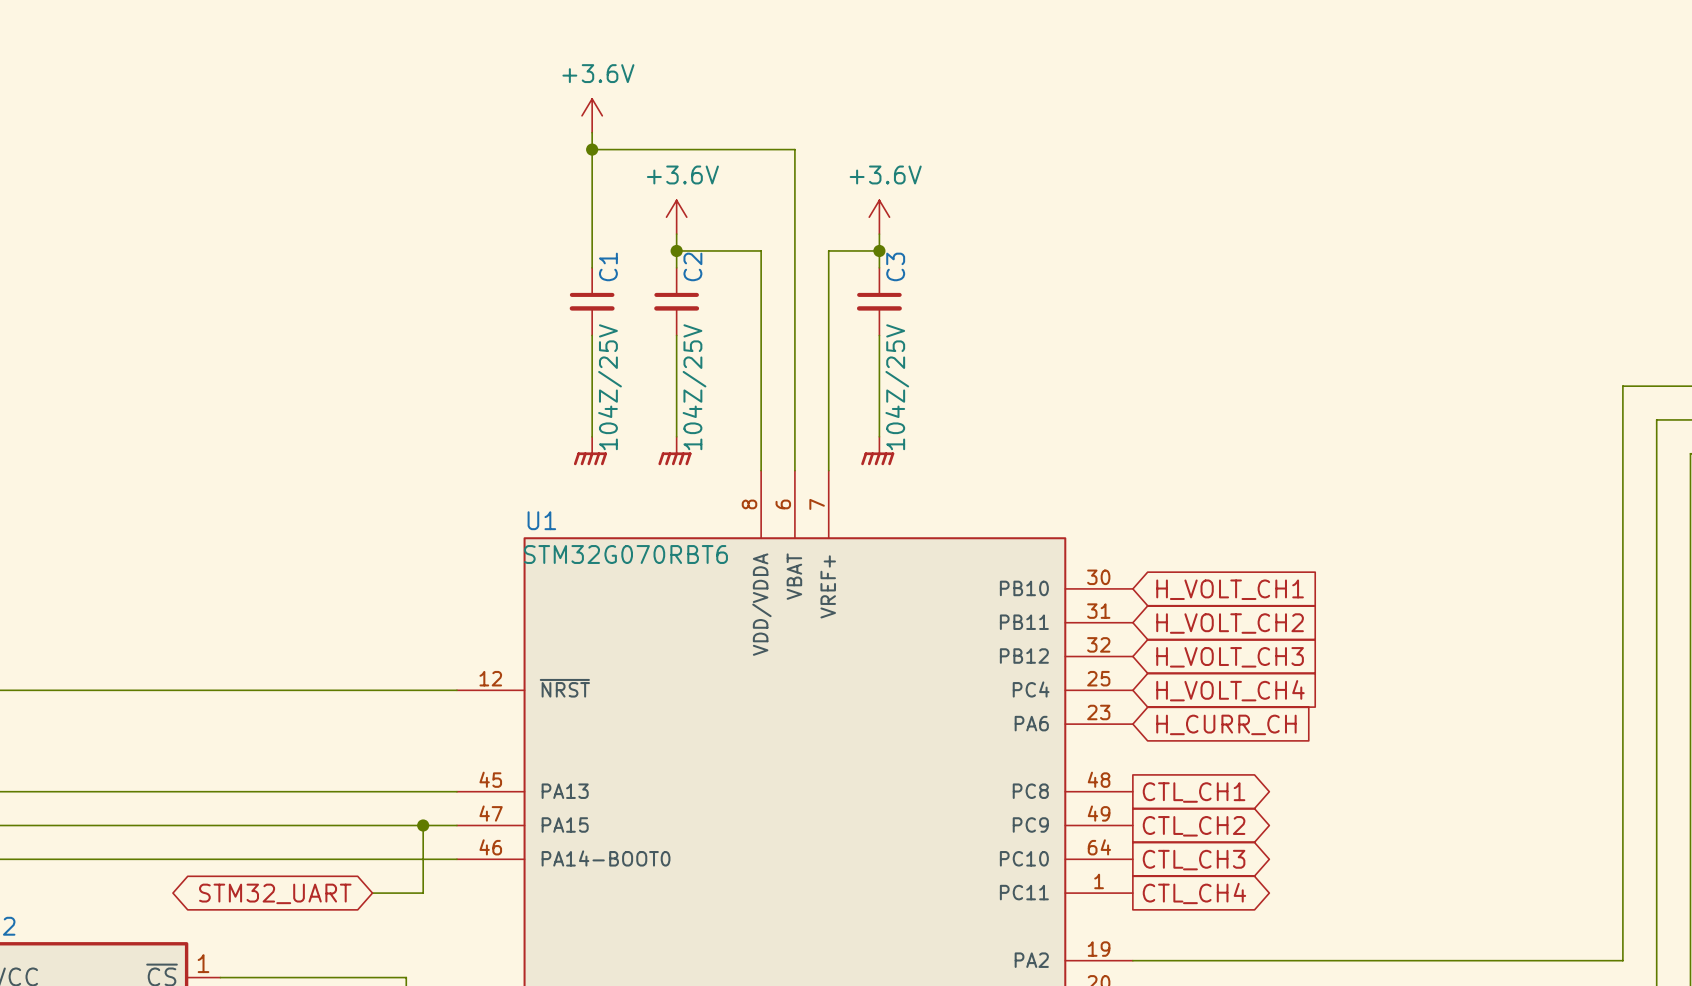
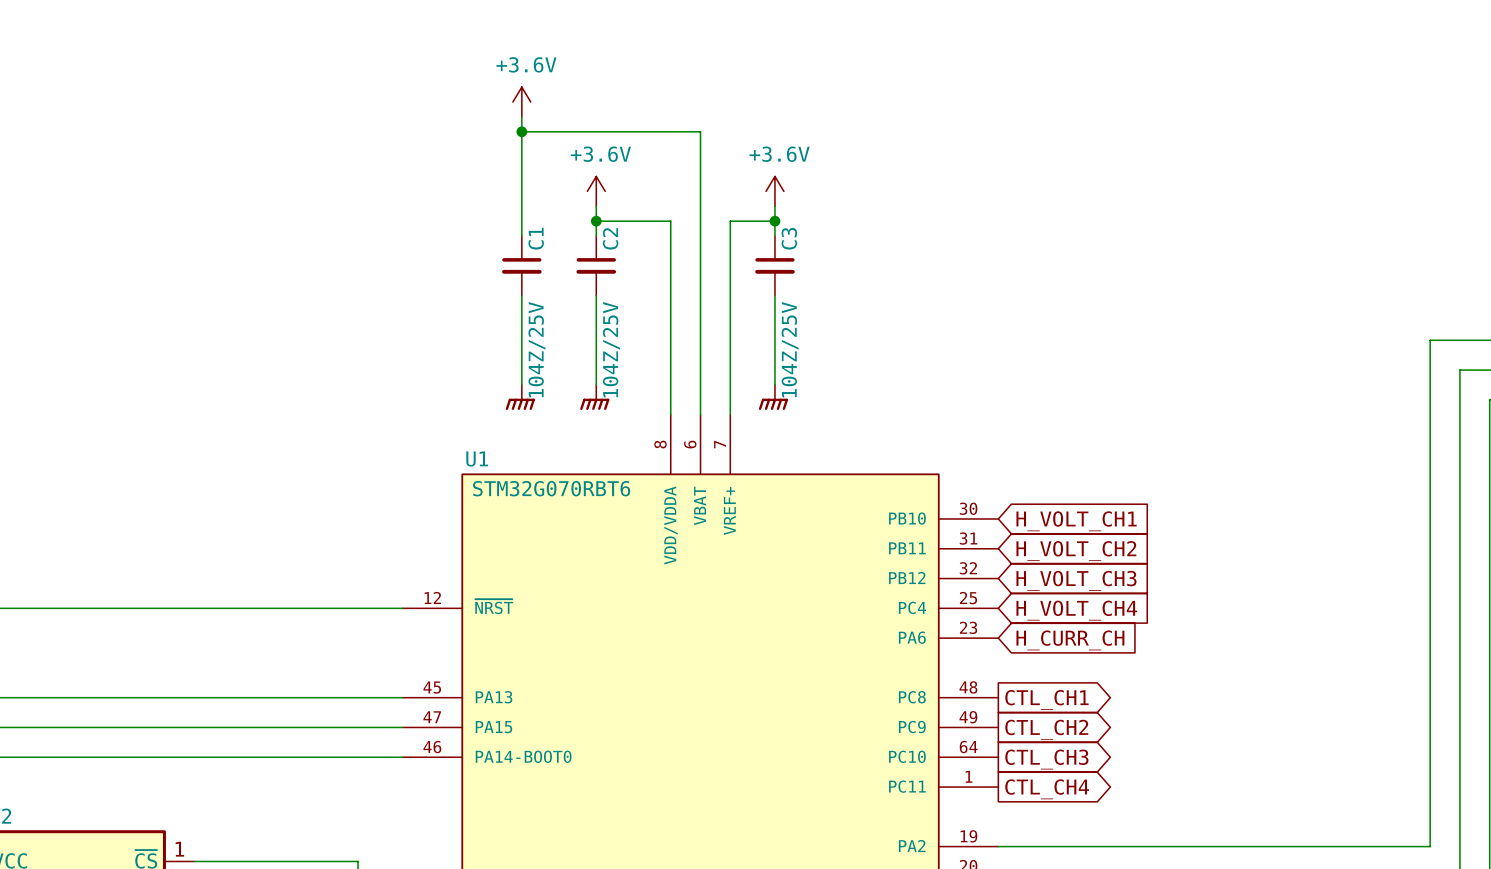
wire: (423, 825) (423, 893) (372, 893) -> none
junction: (423, 825) -> none
global label: STM32_UART (275, 893) -> none

